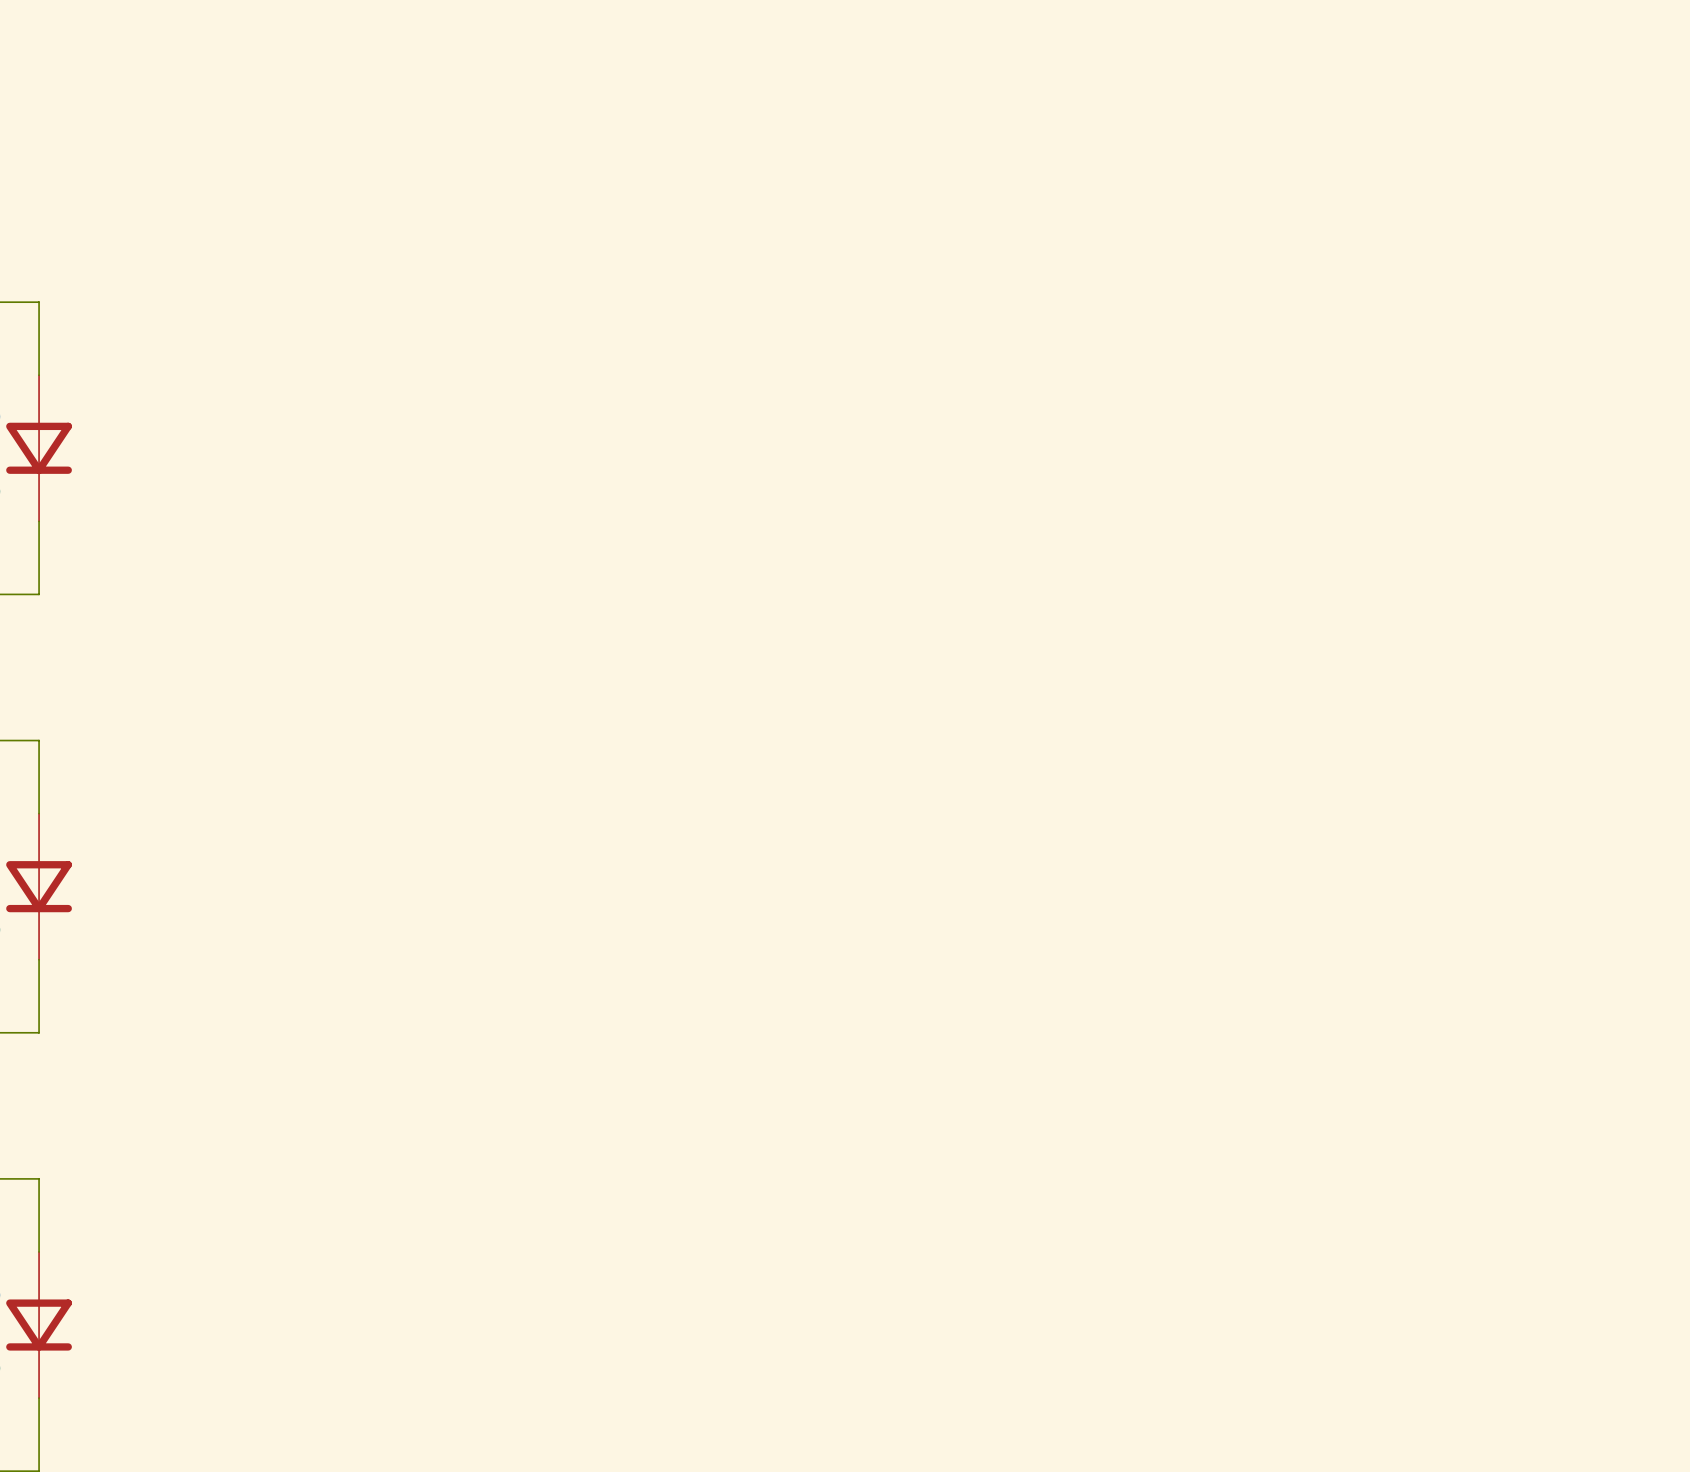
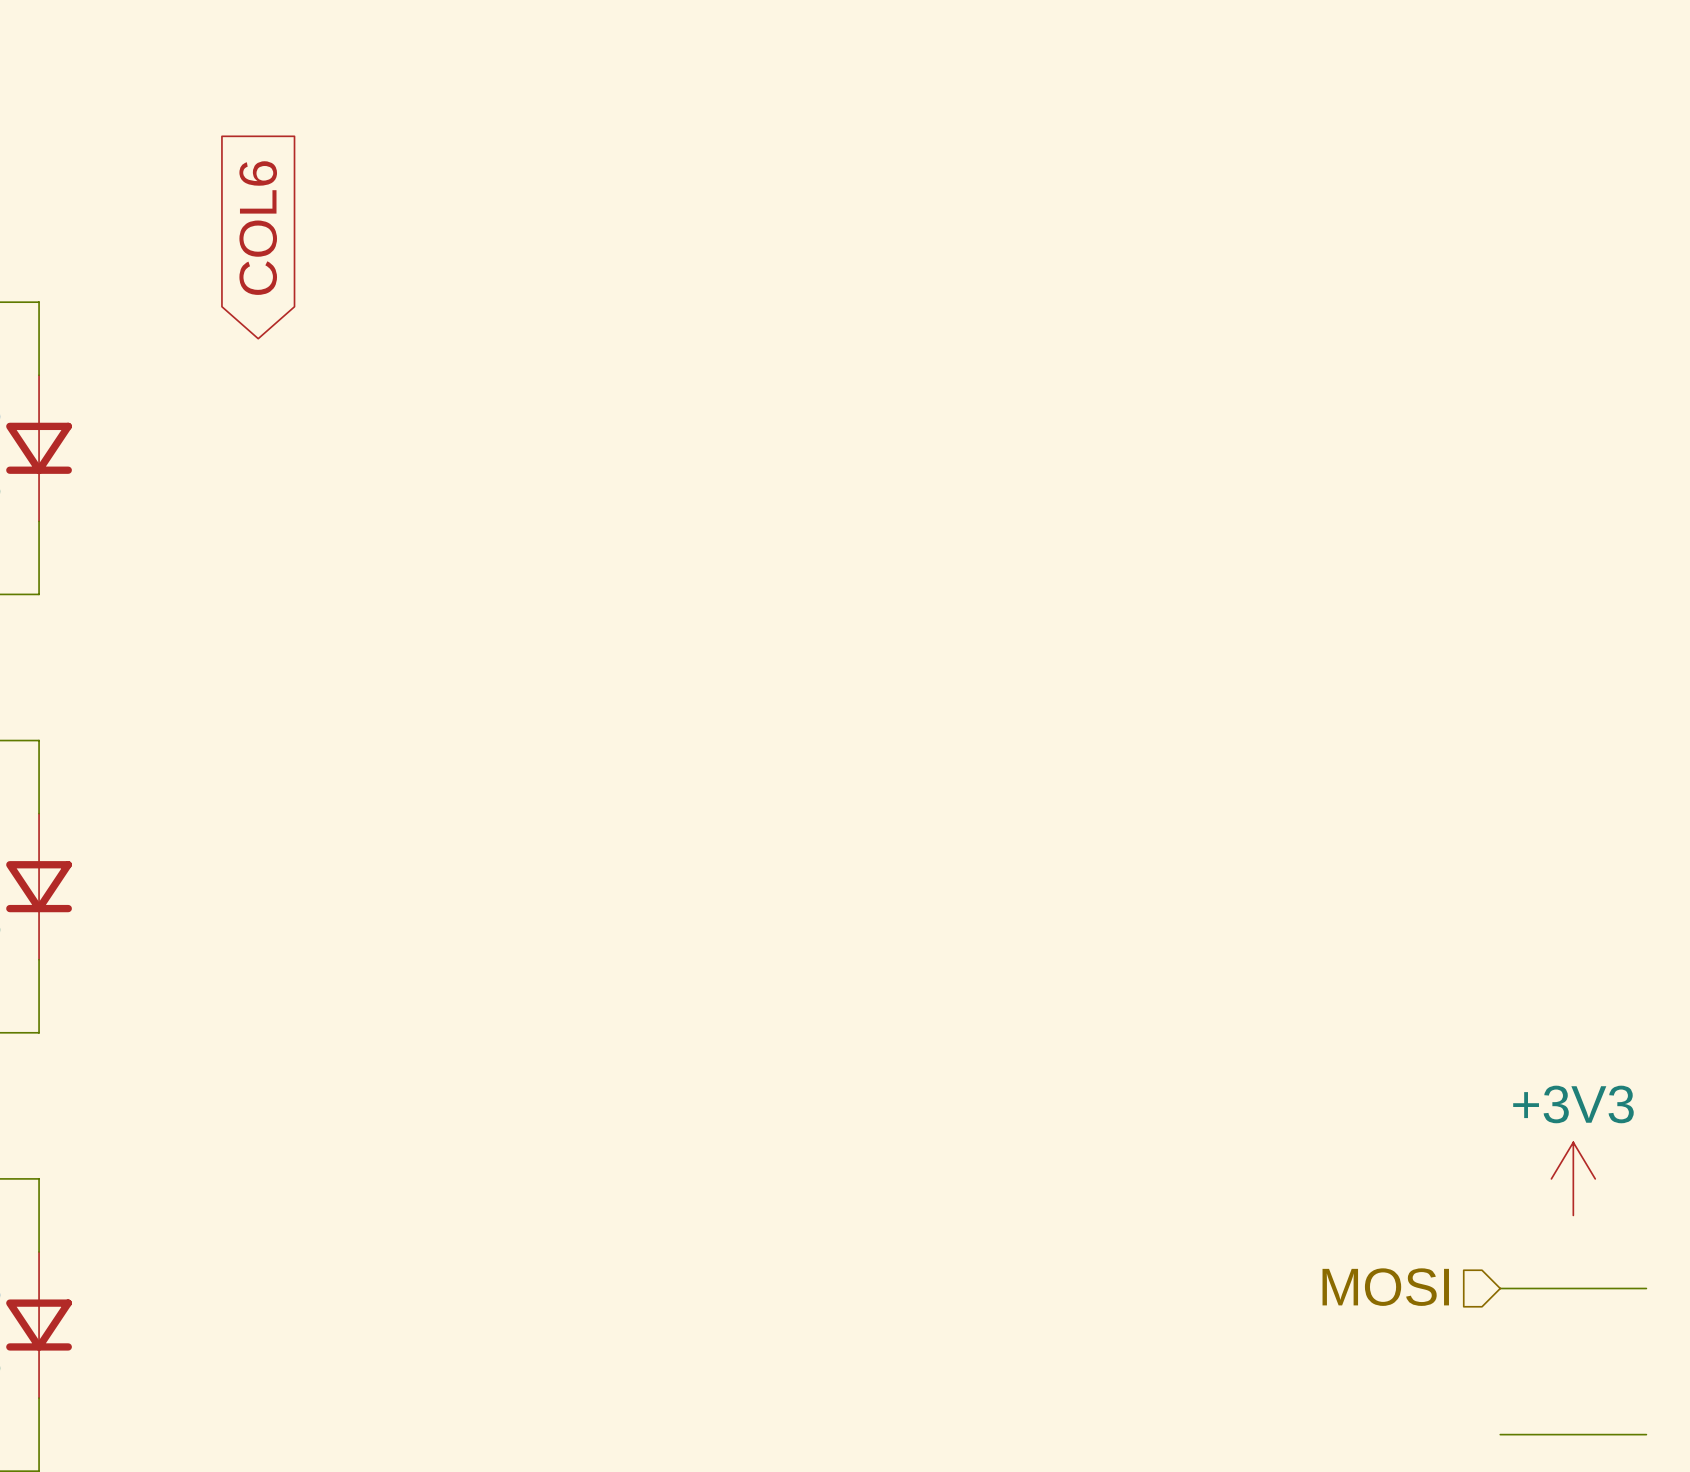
global label: none -> COL6 (258, 228)
power symbol: none -> +3V3 (1573, 1178)
hierarchical label: none -> MOSI (1385, 1287)
wire: none -> (1500, 1288) (1646, 1288)
wire: none -> (1500, 1434) (1646, 1434)

